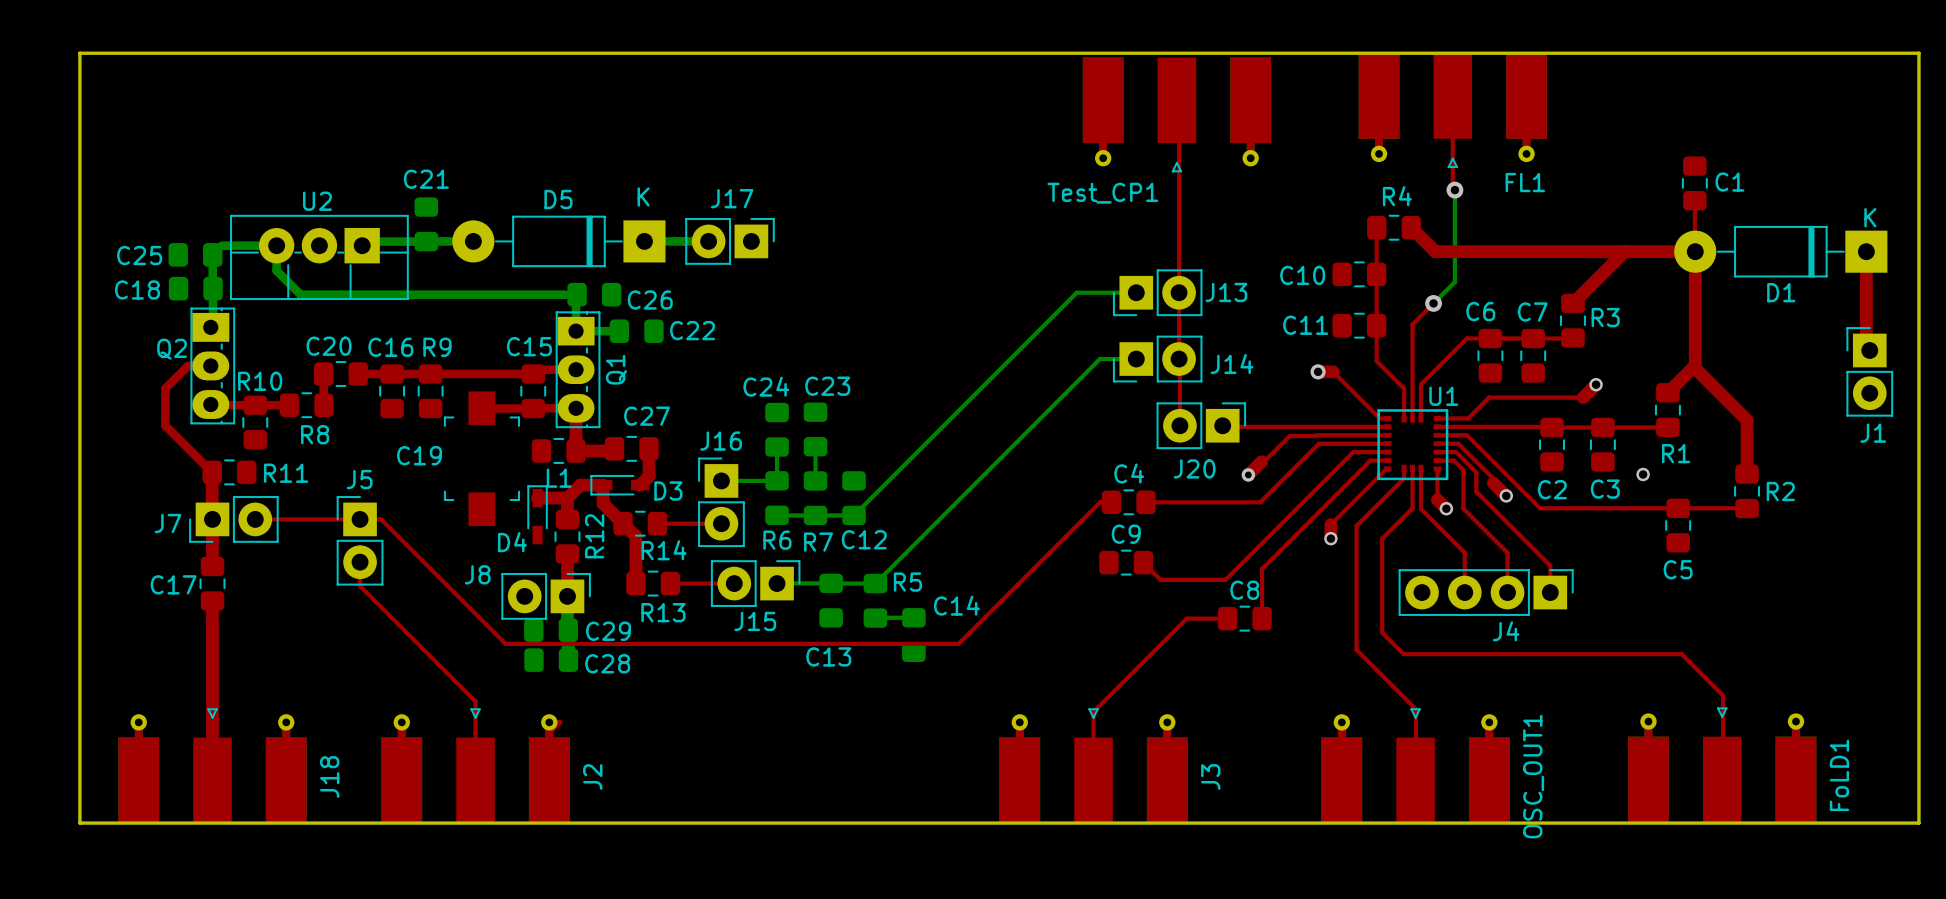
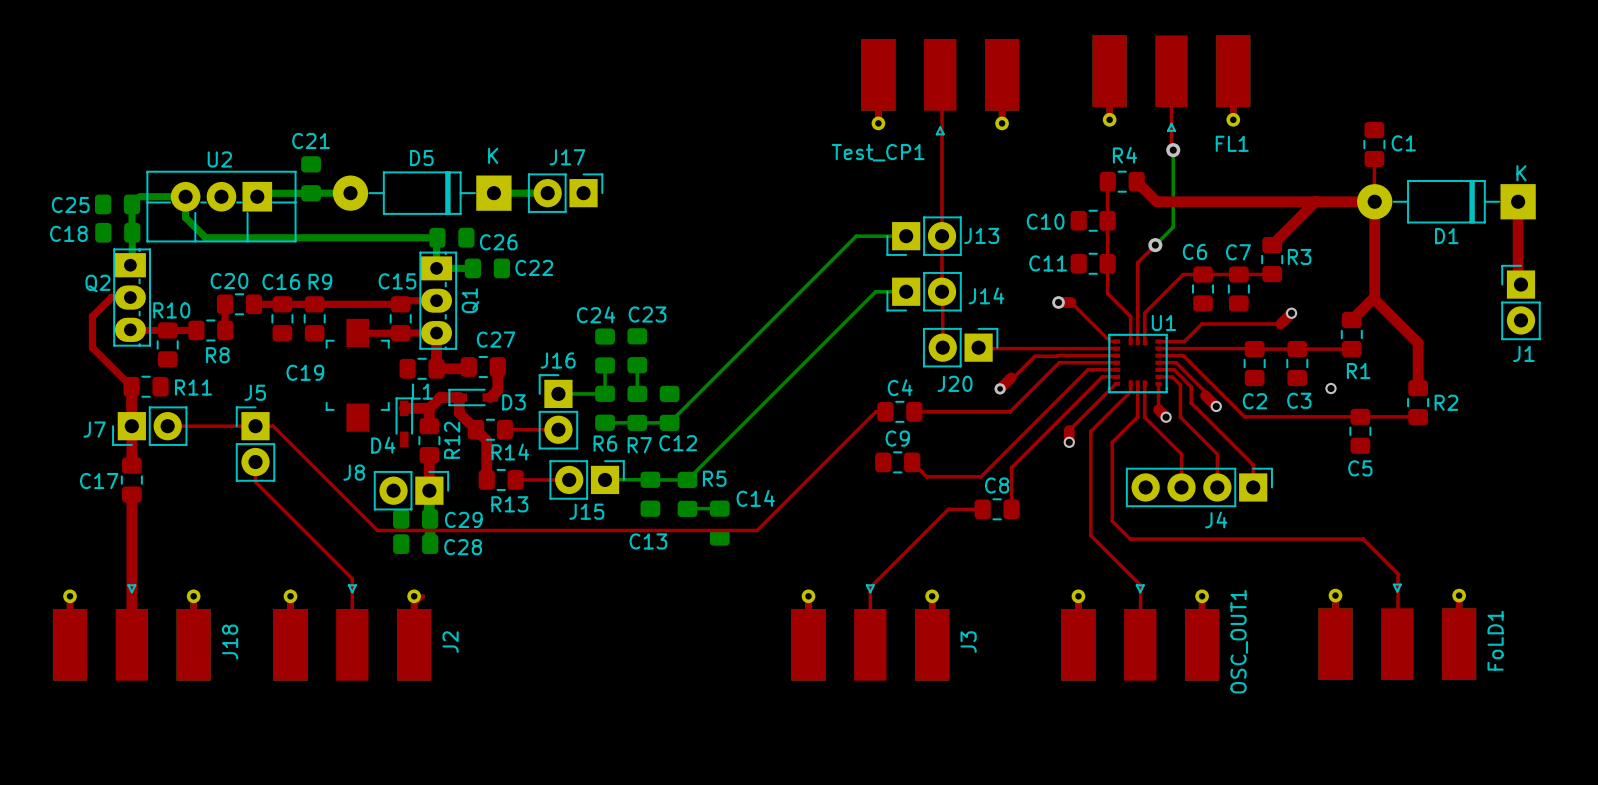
board edge: (79, 53) (1918, 53) (1918, 823) (79, 823) (79, 53) -> none

